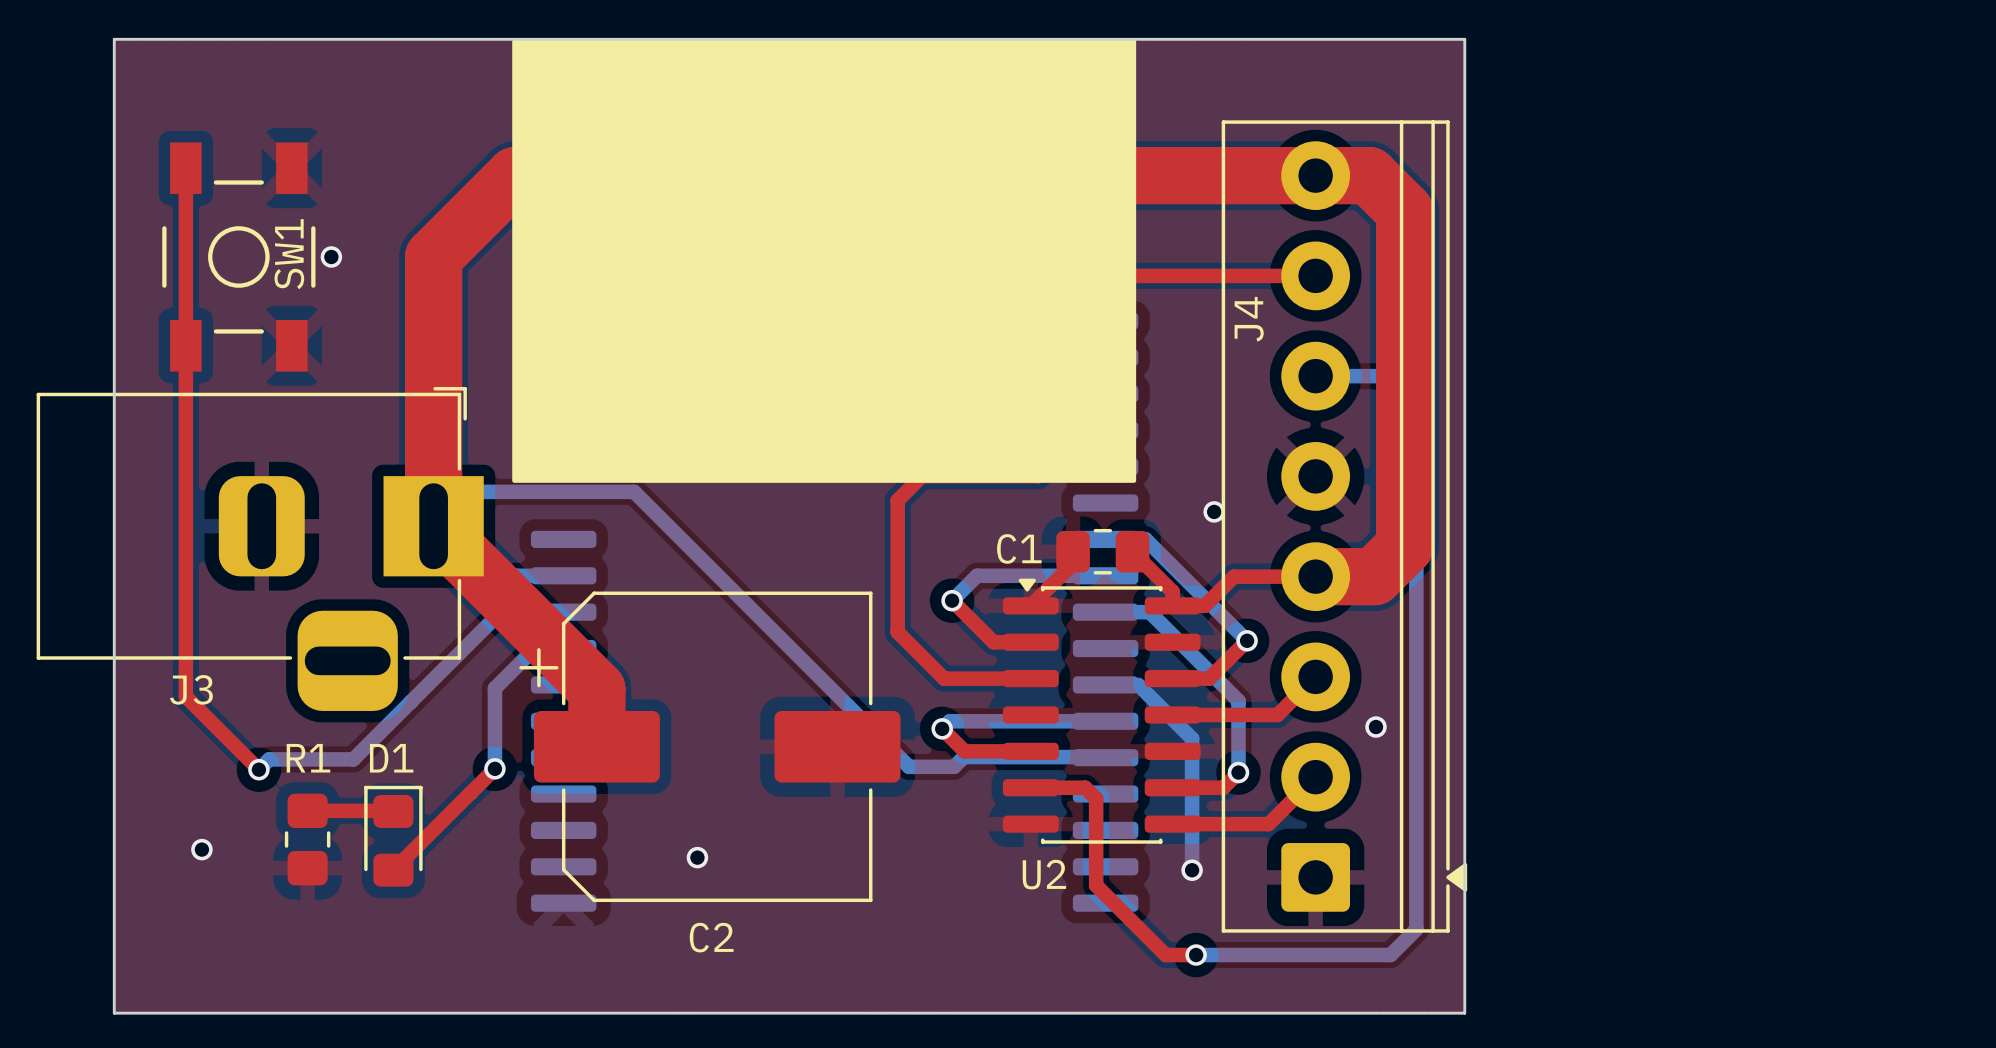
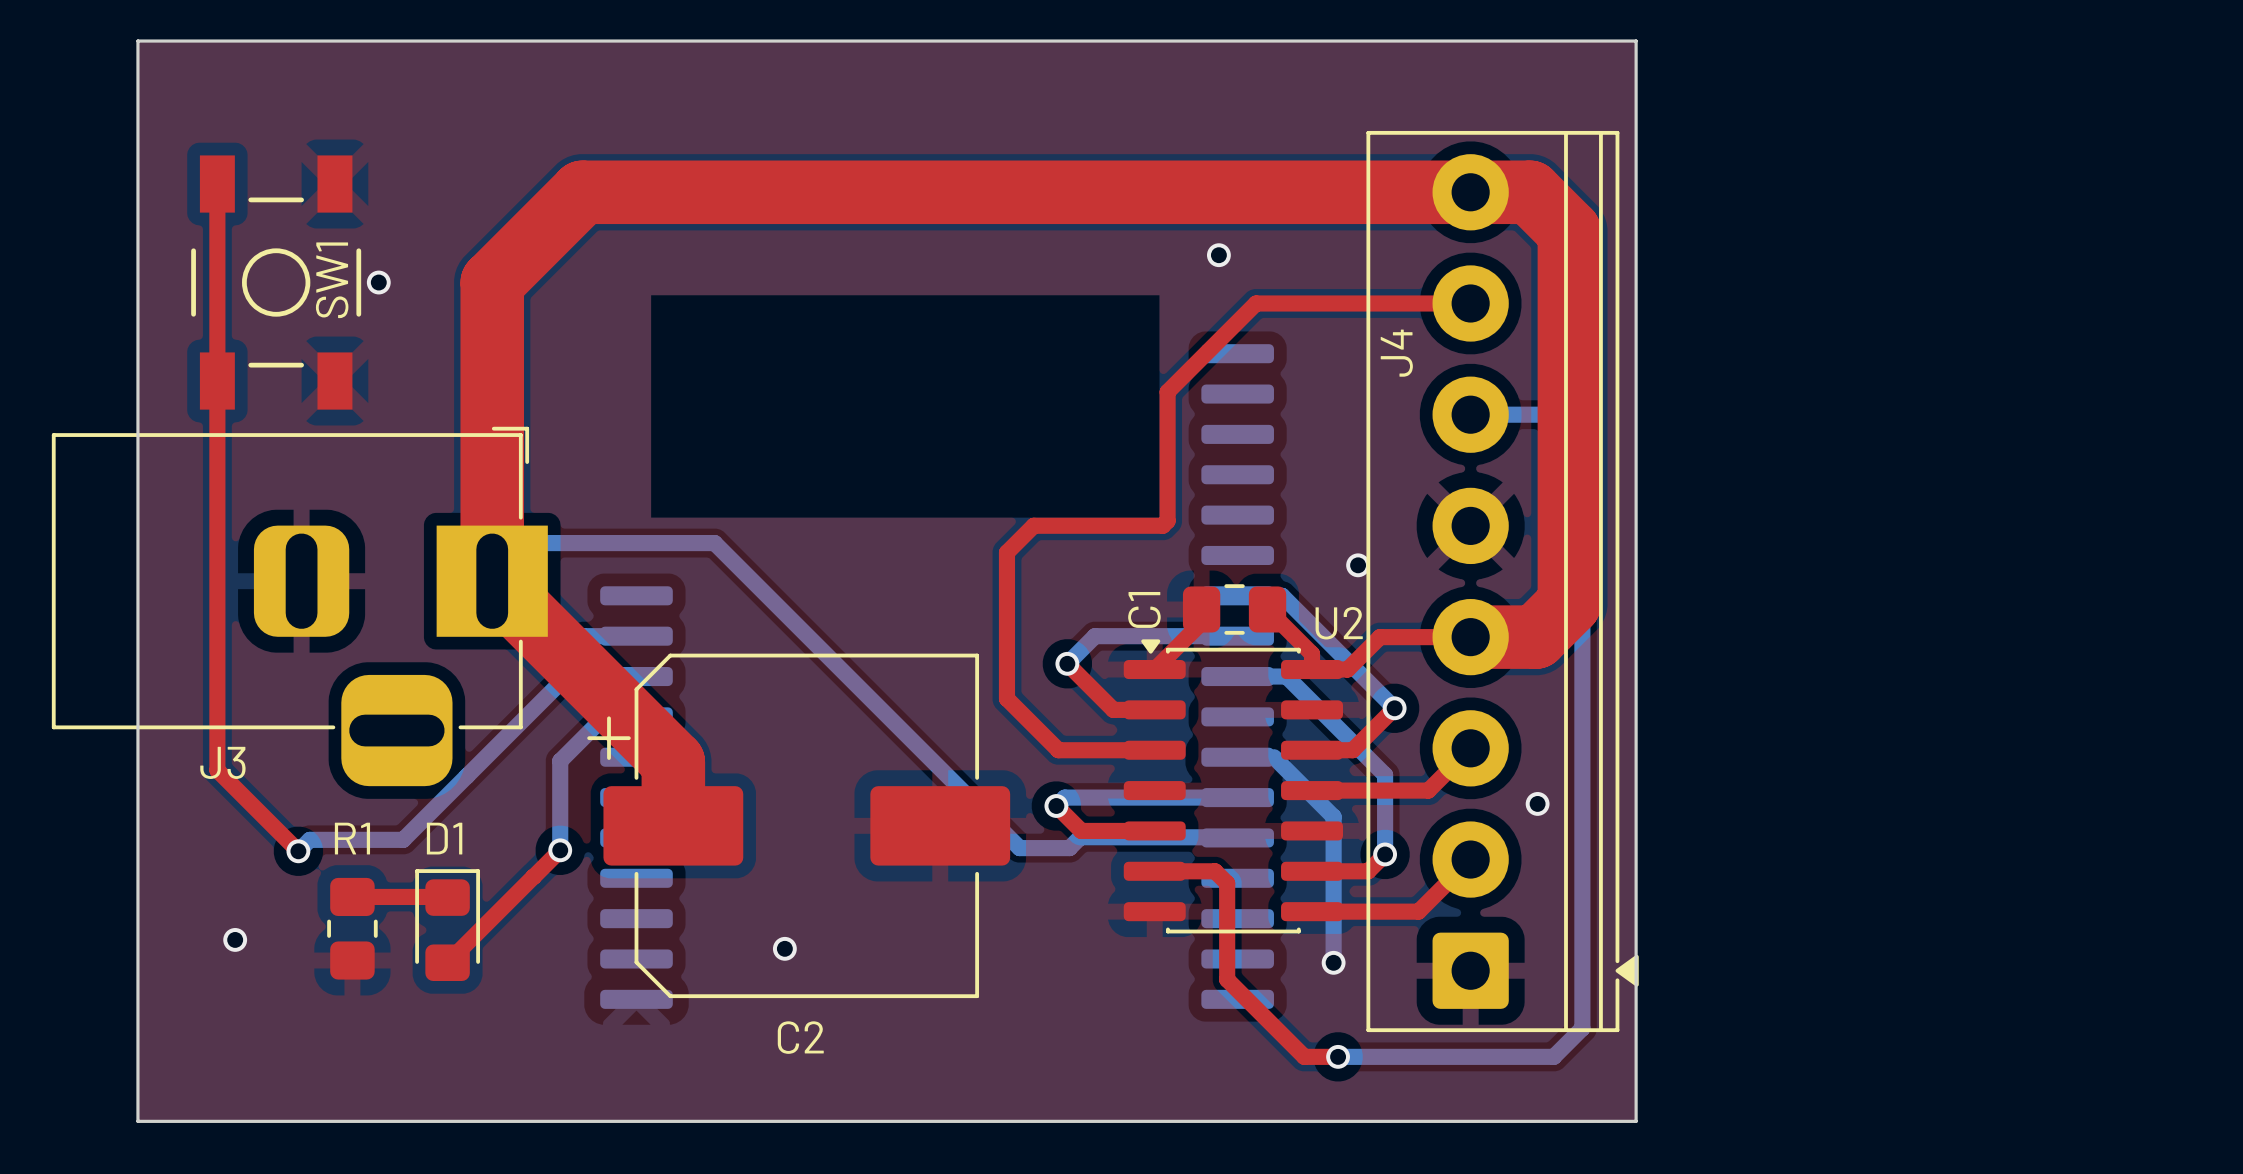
drawing: [512, 39, 1137, 483] -> none
C1 name rotation: 0° (1019, 548) -> 90° counterclockwise (1144, 609)
U2 name position: U2 (1044, 874) -> U2 (1339, 623)

